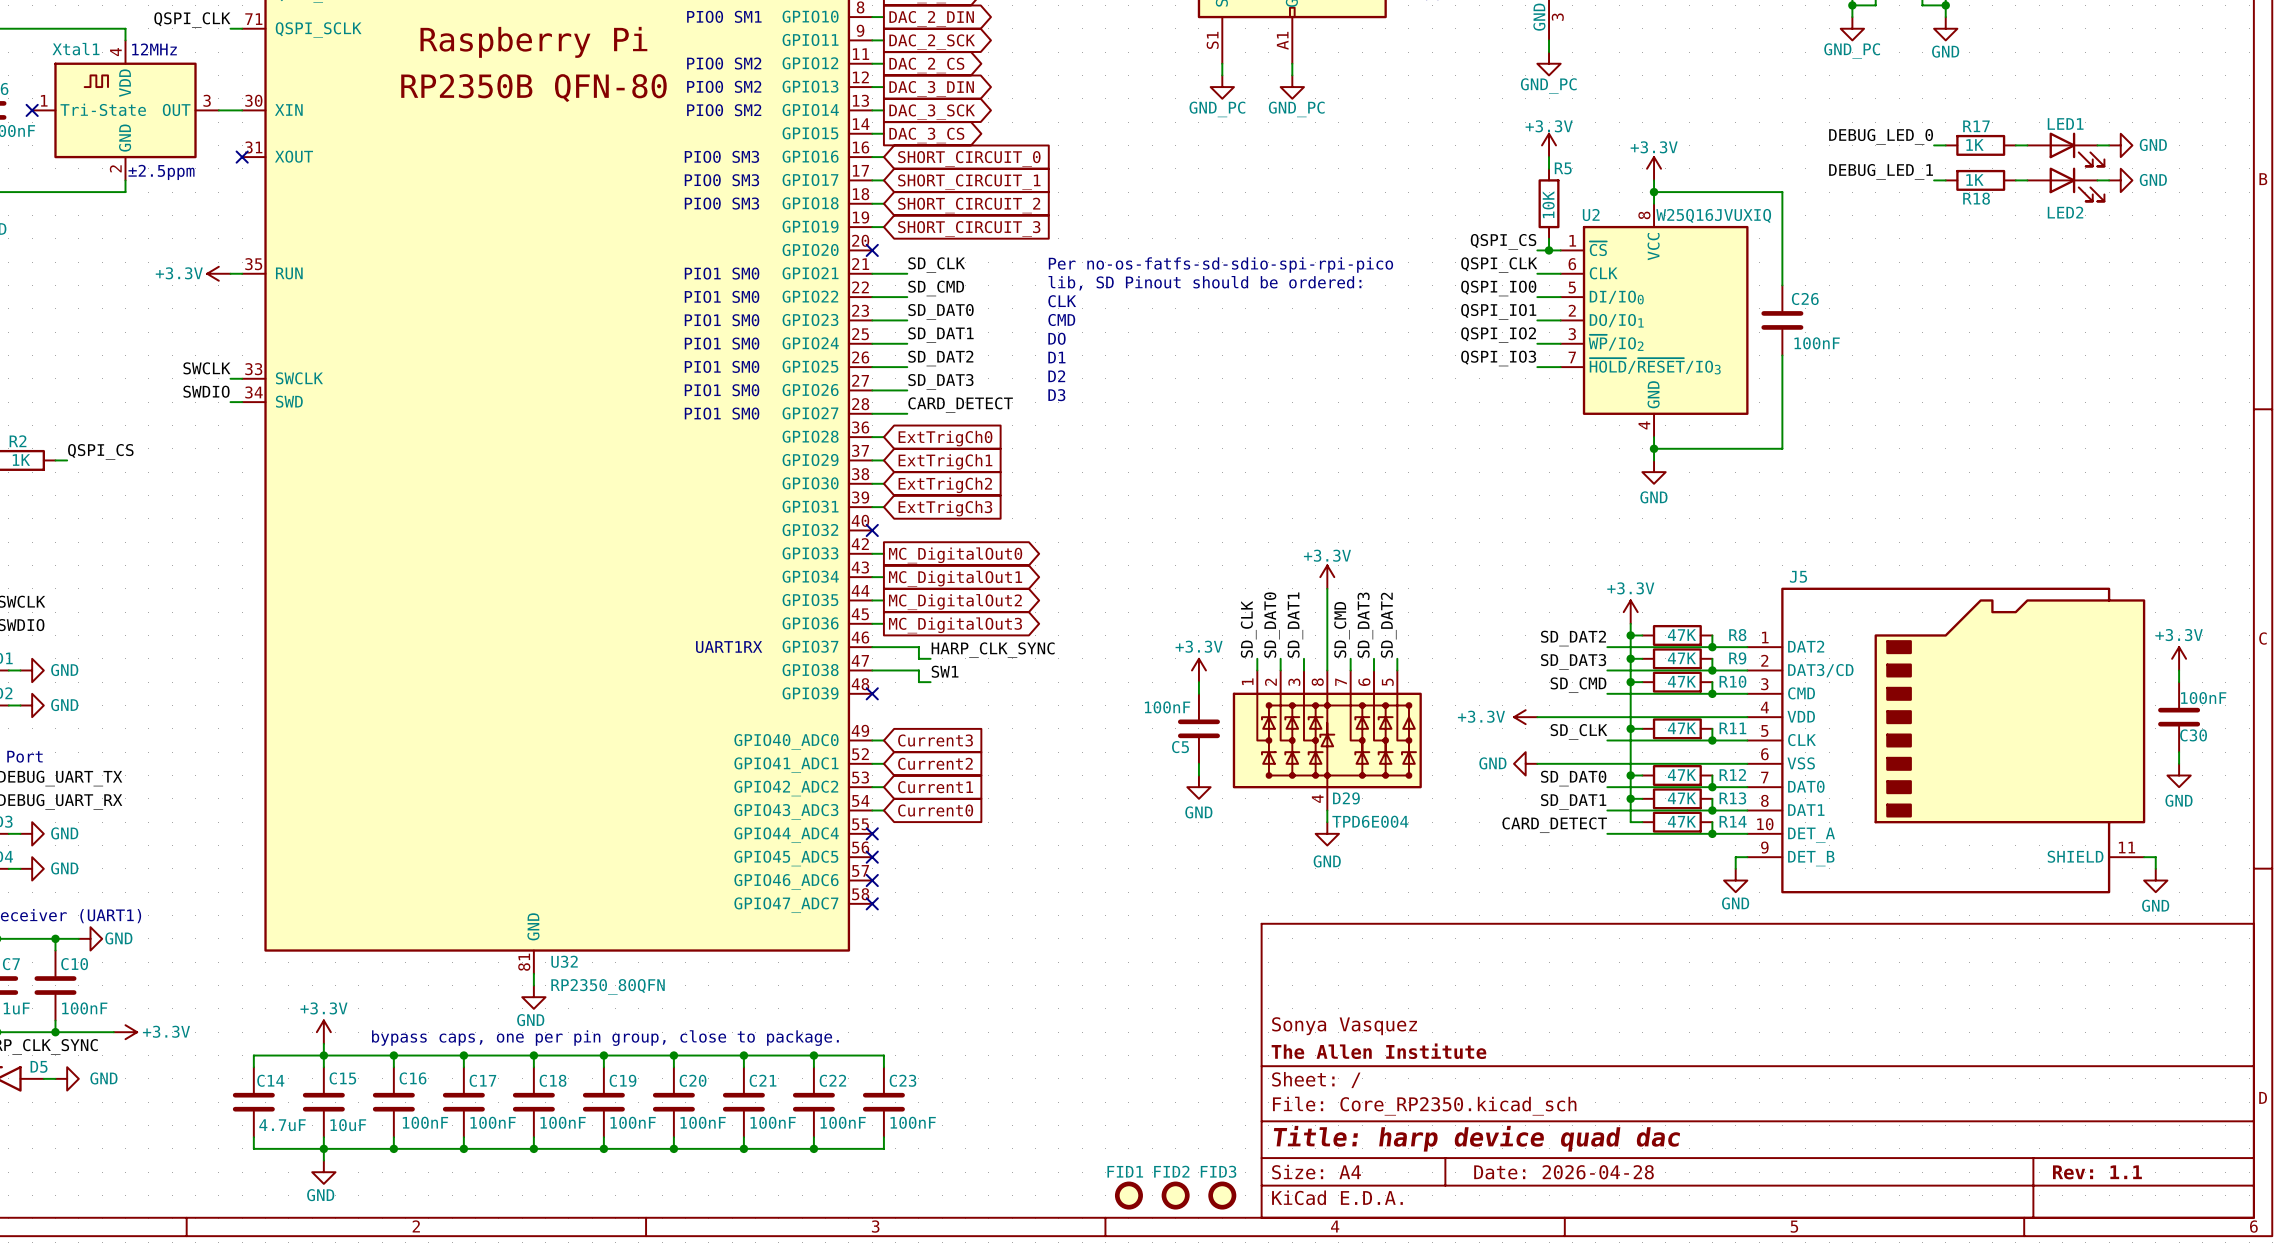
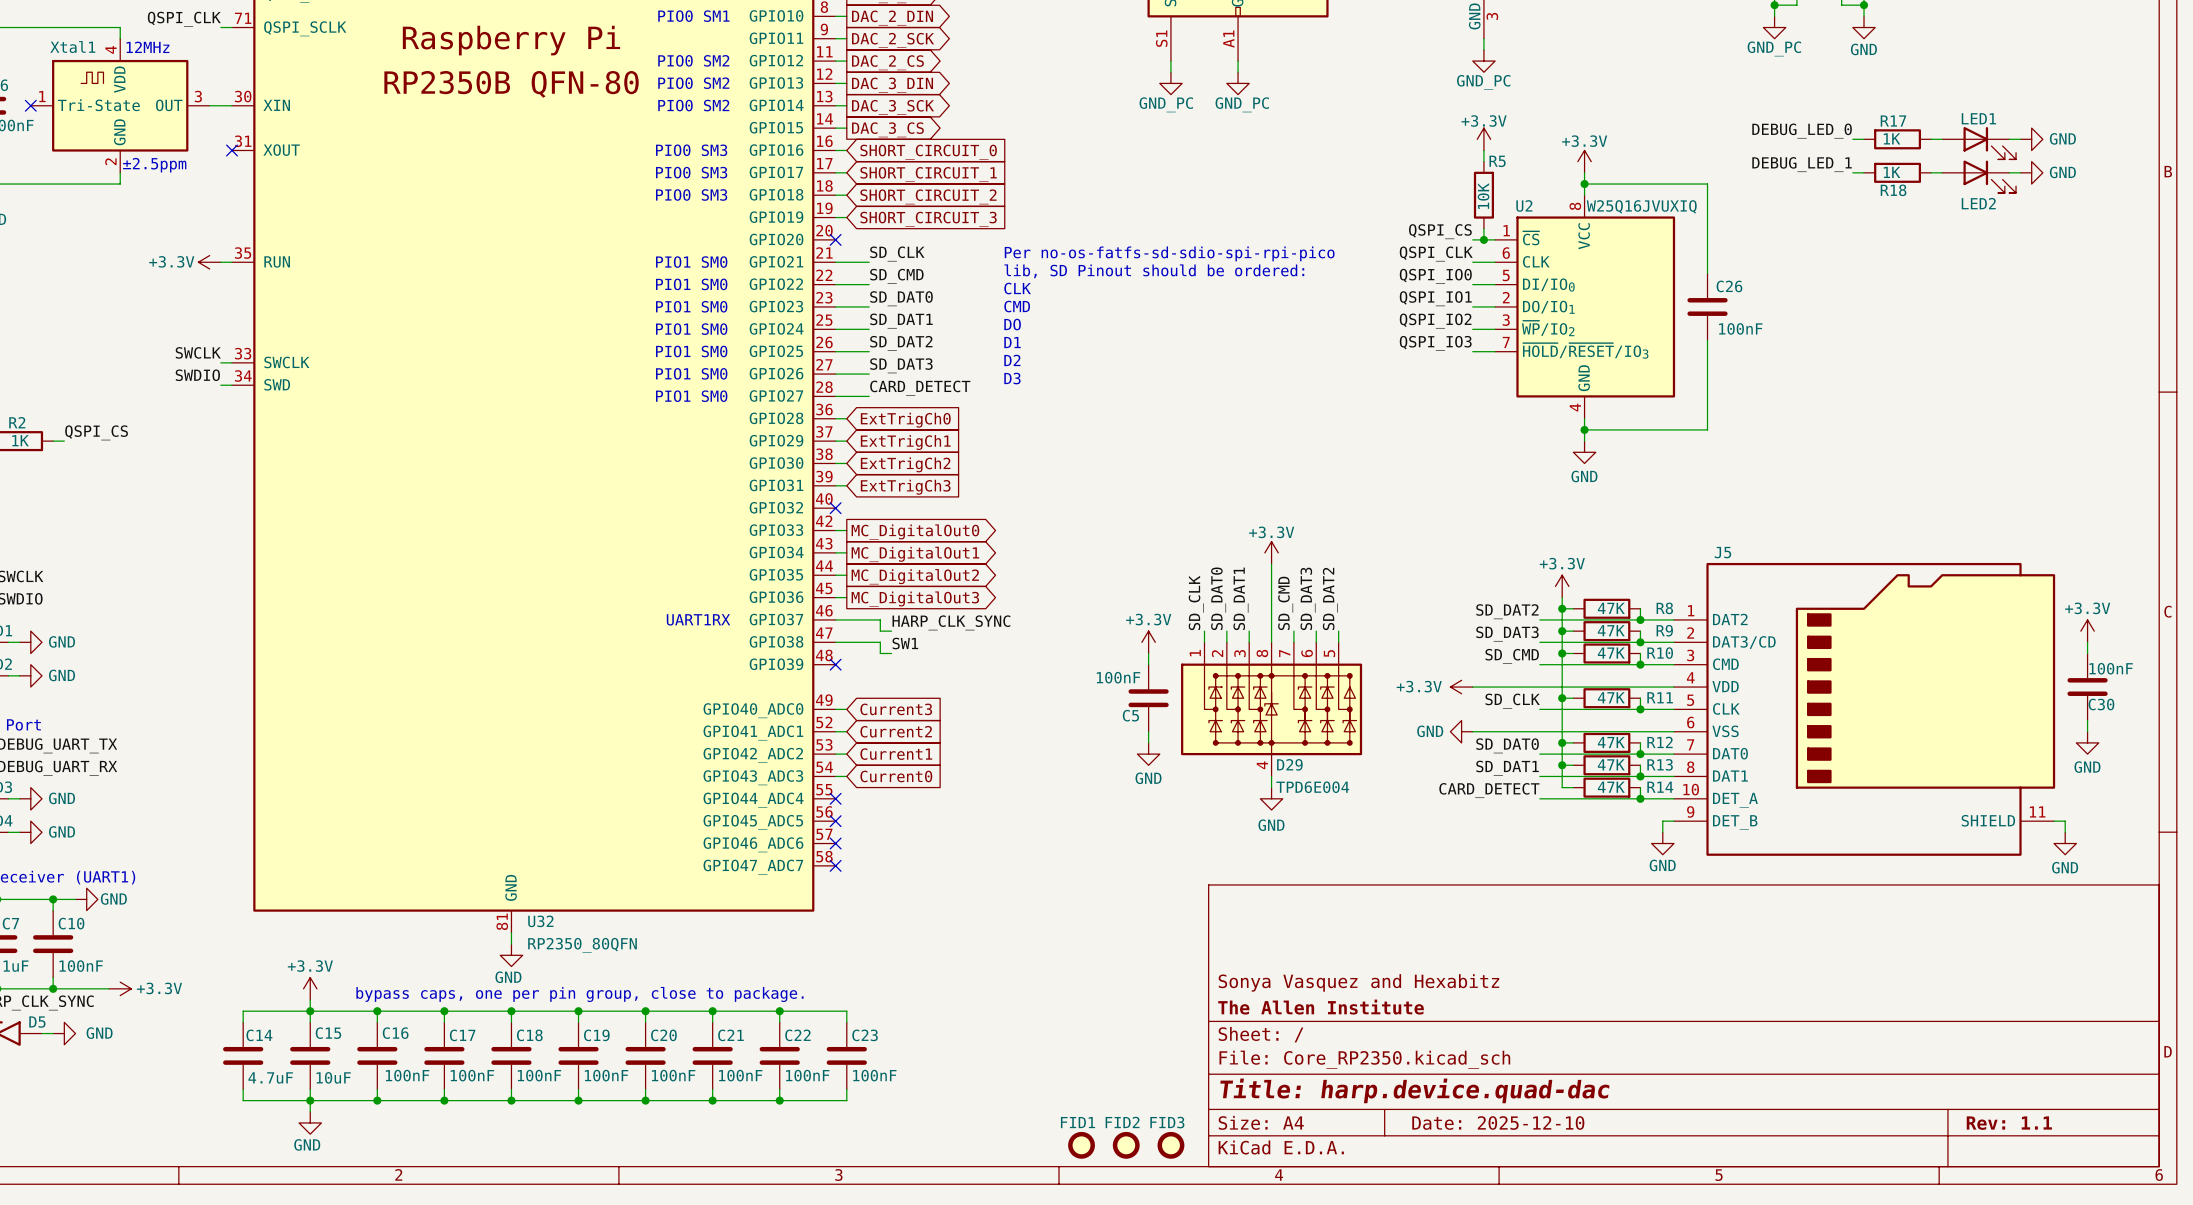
title block: Sonya Vasquez (1344, 1026) -> Sonya Vasquez and Hexabitz (1358, 982)
title block: Title: harp device quad dac (1476, 1138) -> Title: harp.device.quad-dac (1414, 1090)
title block: Date: 2026-04-28 (1564, 1172) -> Date: 2025-12-10 (1498, 1123)

